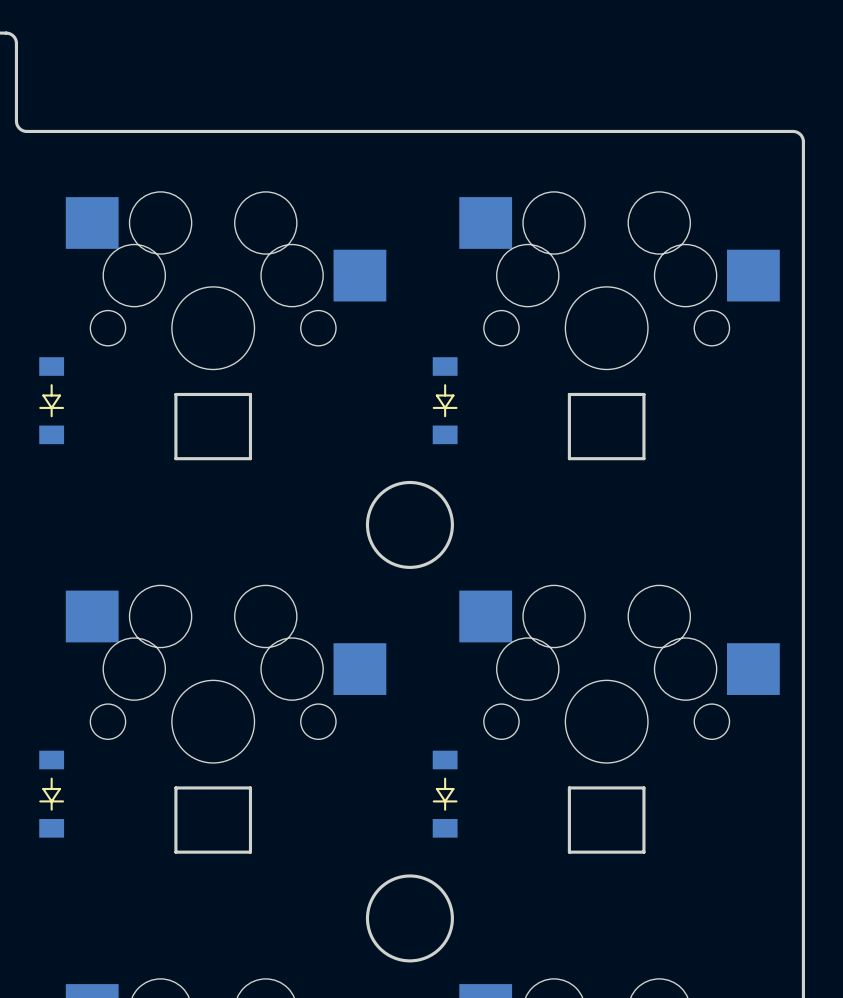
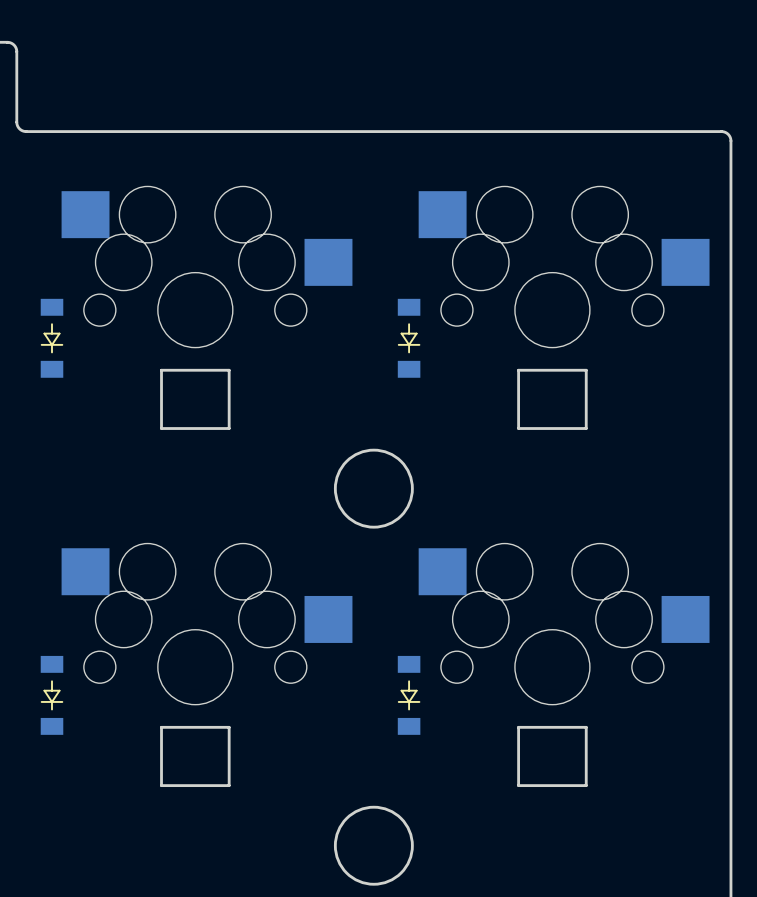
part position: (51, 400) -> (51, 338)
part position: (445, 400) -> (409, 338)
part position: (51, 794) -> (51, 695)
part position: (445, 794) -> (409, 695)

